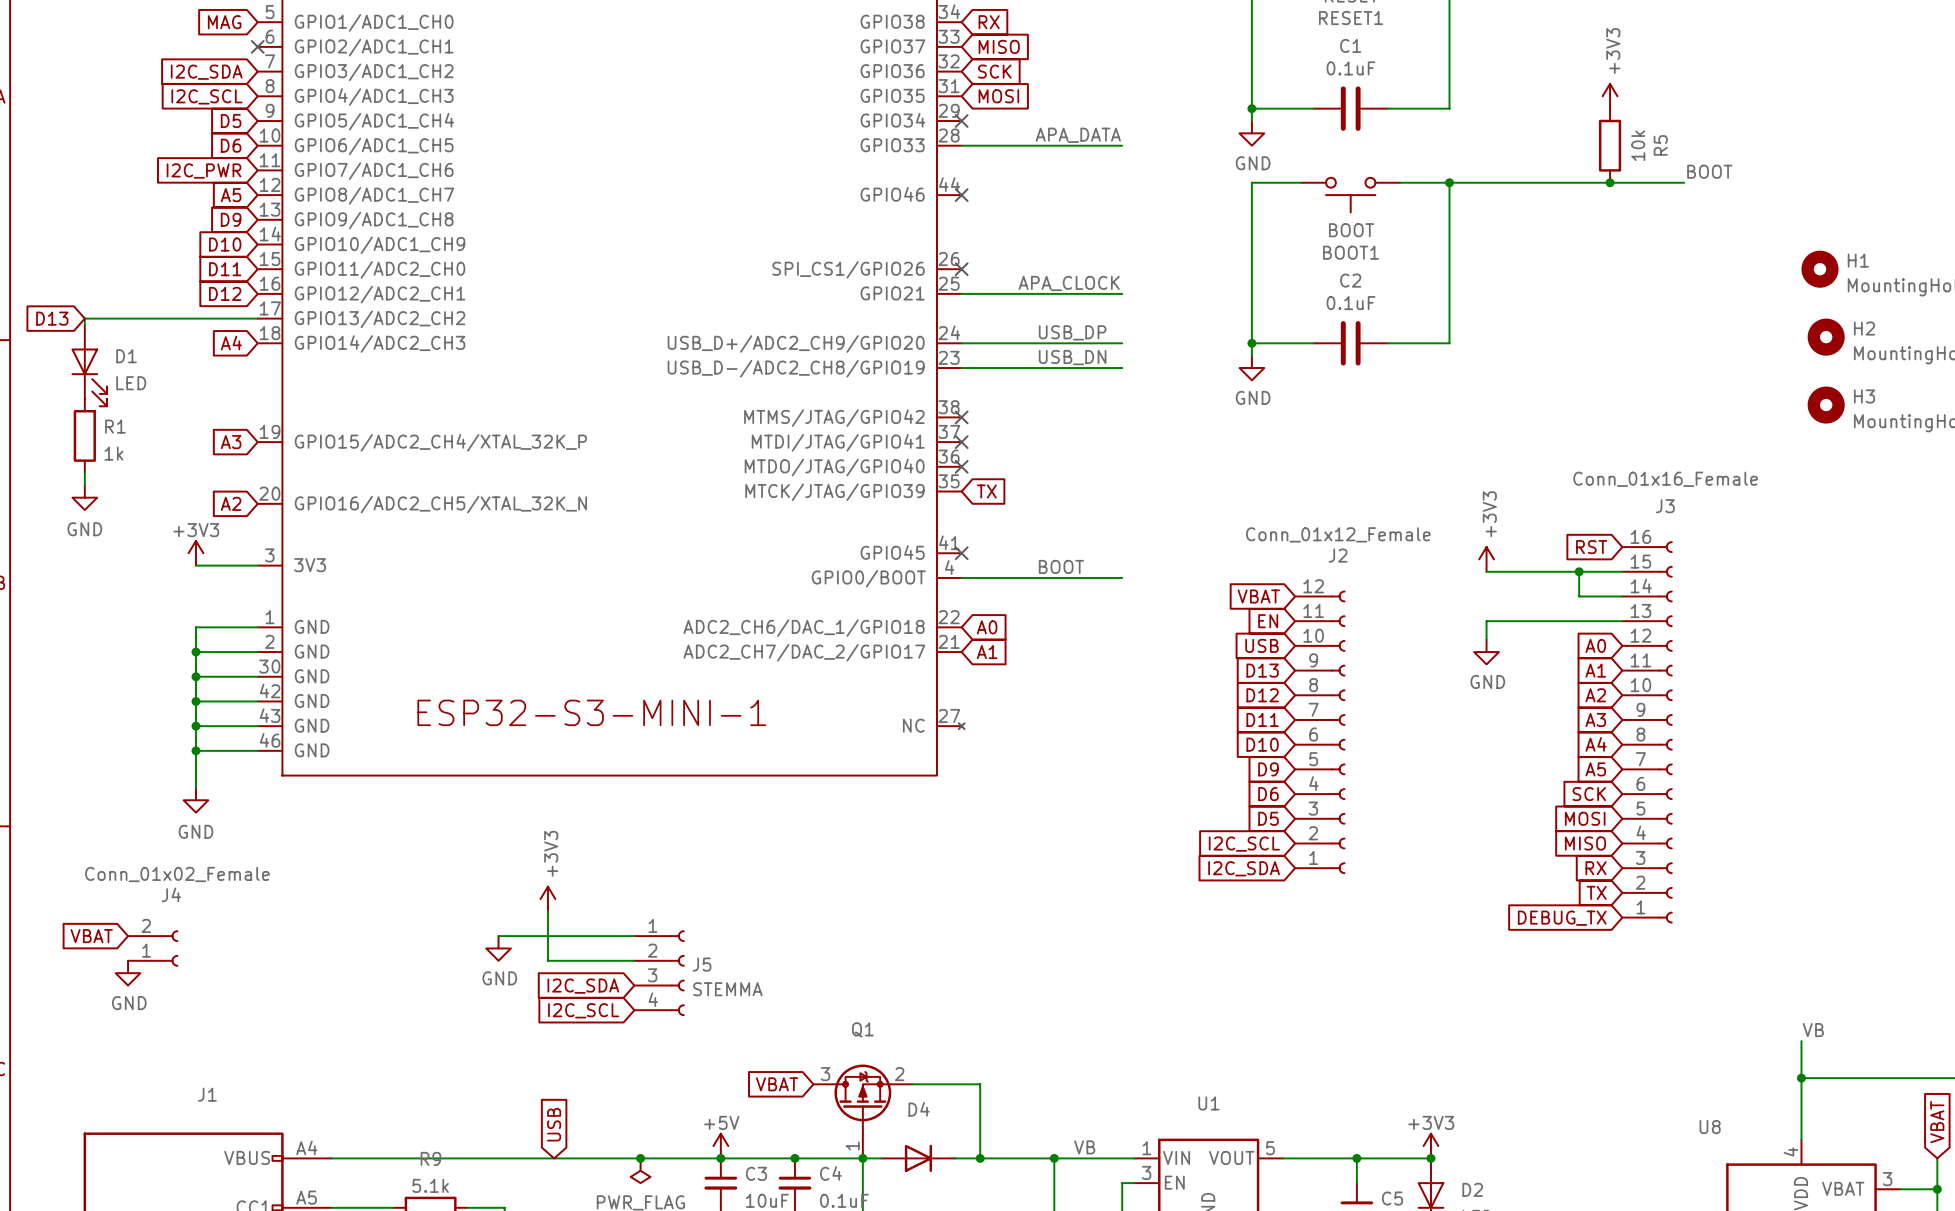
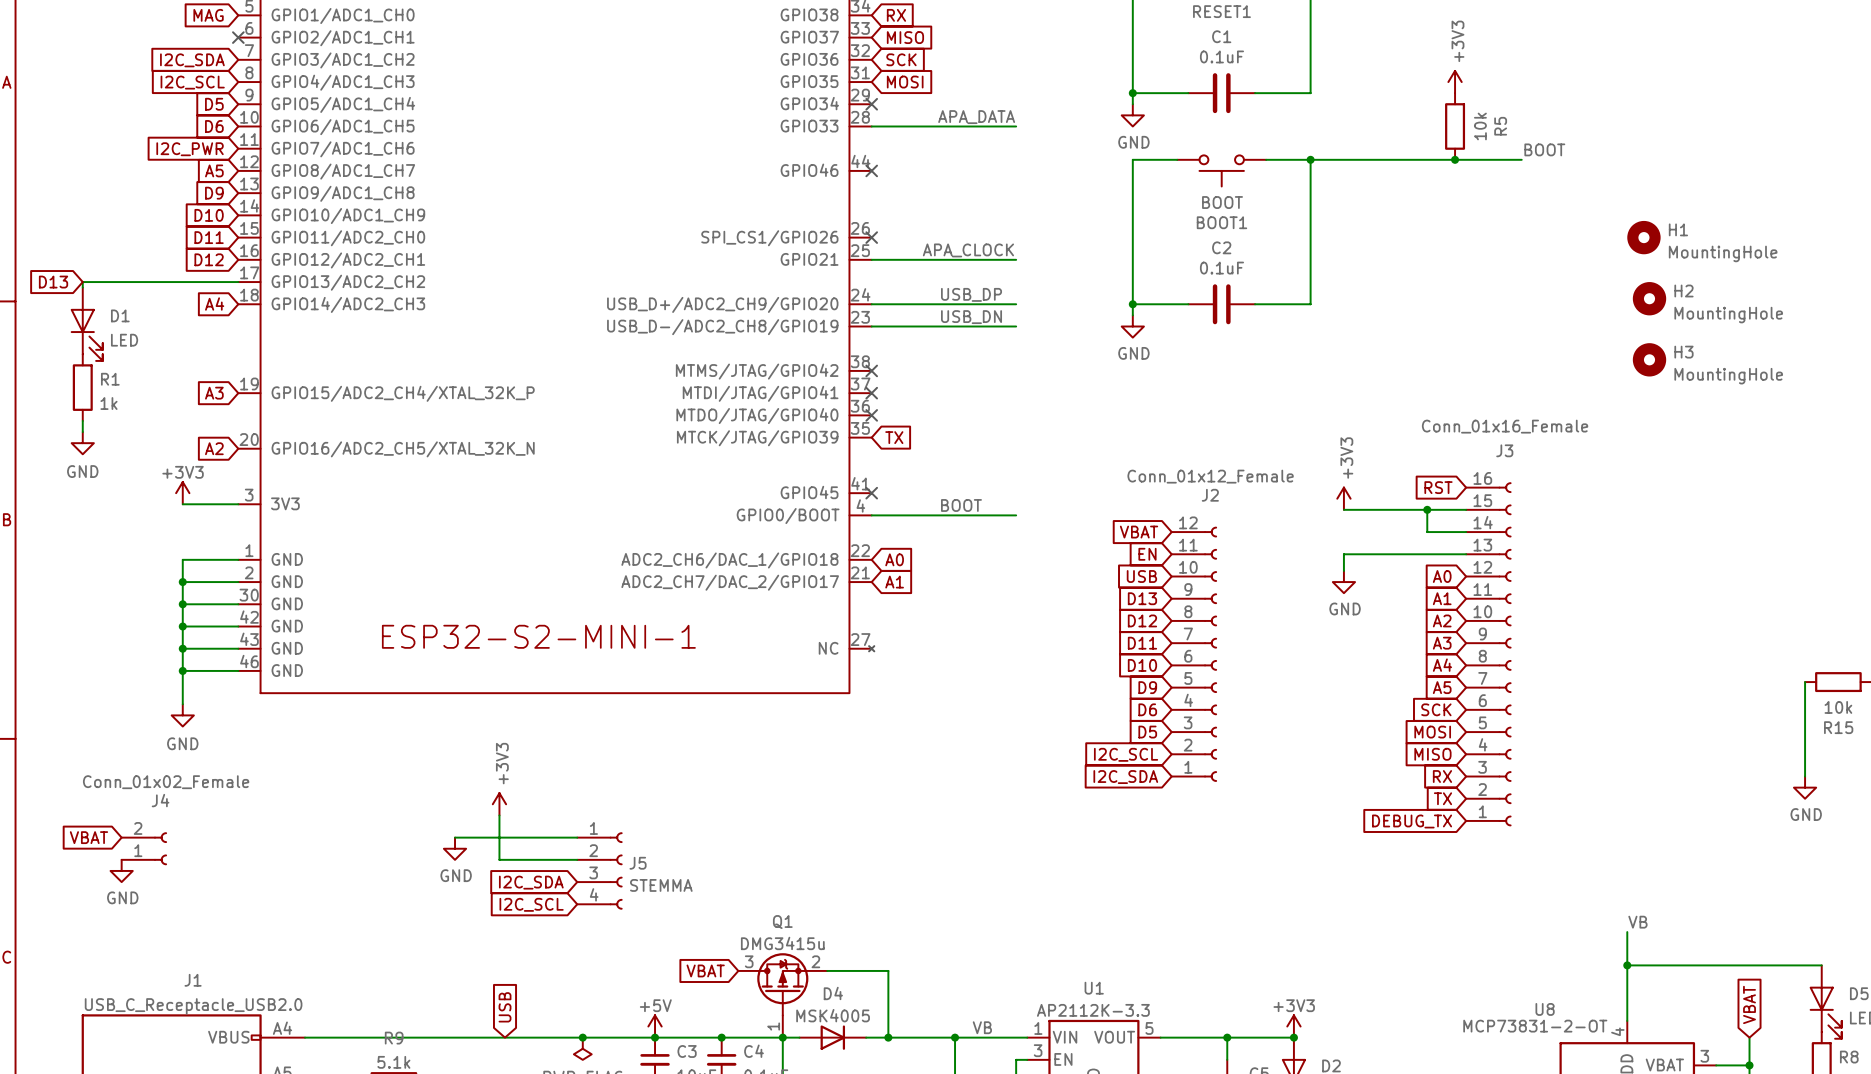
part text: ESP32-S3-MINI-1 (591, 712) -> ESP32-S2-MINI-1 (538, 636)
Q1 value: none -> DMG3415u (782, 943)
J1 value: none -> USB_C_Receptacle_USB2.0 (193, 1006)
U1 value: none -> AP2112K-3.3 (1093, 1010)
D4 value: none -> MSK4005 (833, 1015)
U8 value: none -> MCP73831-2-OT (1535, 1026)

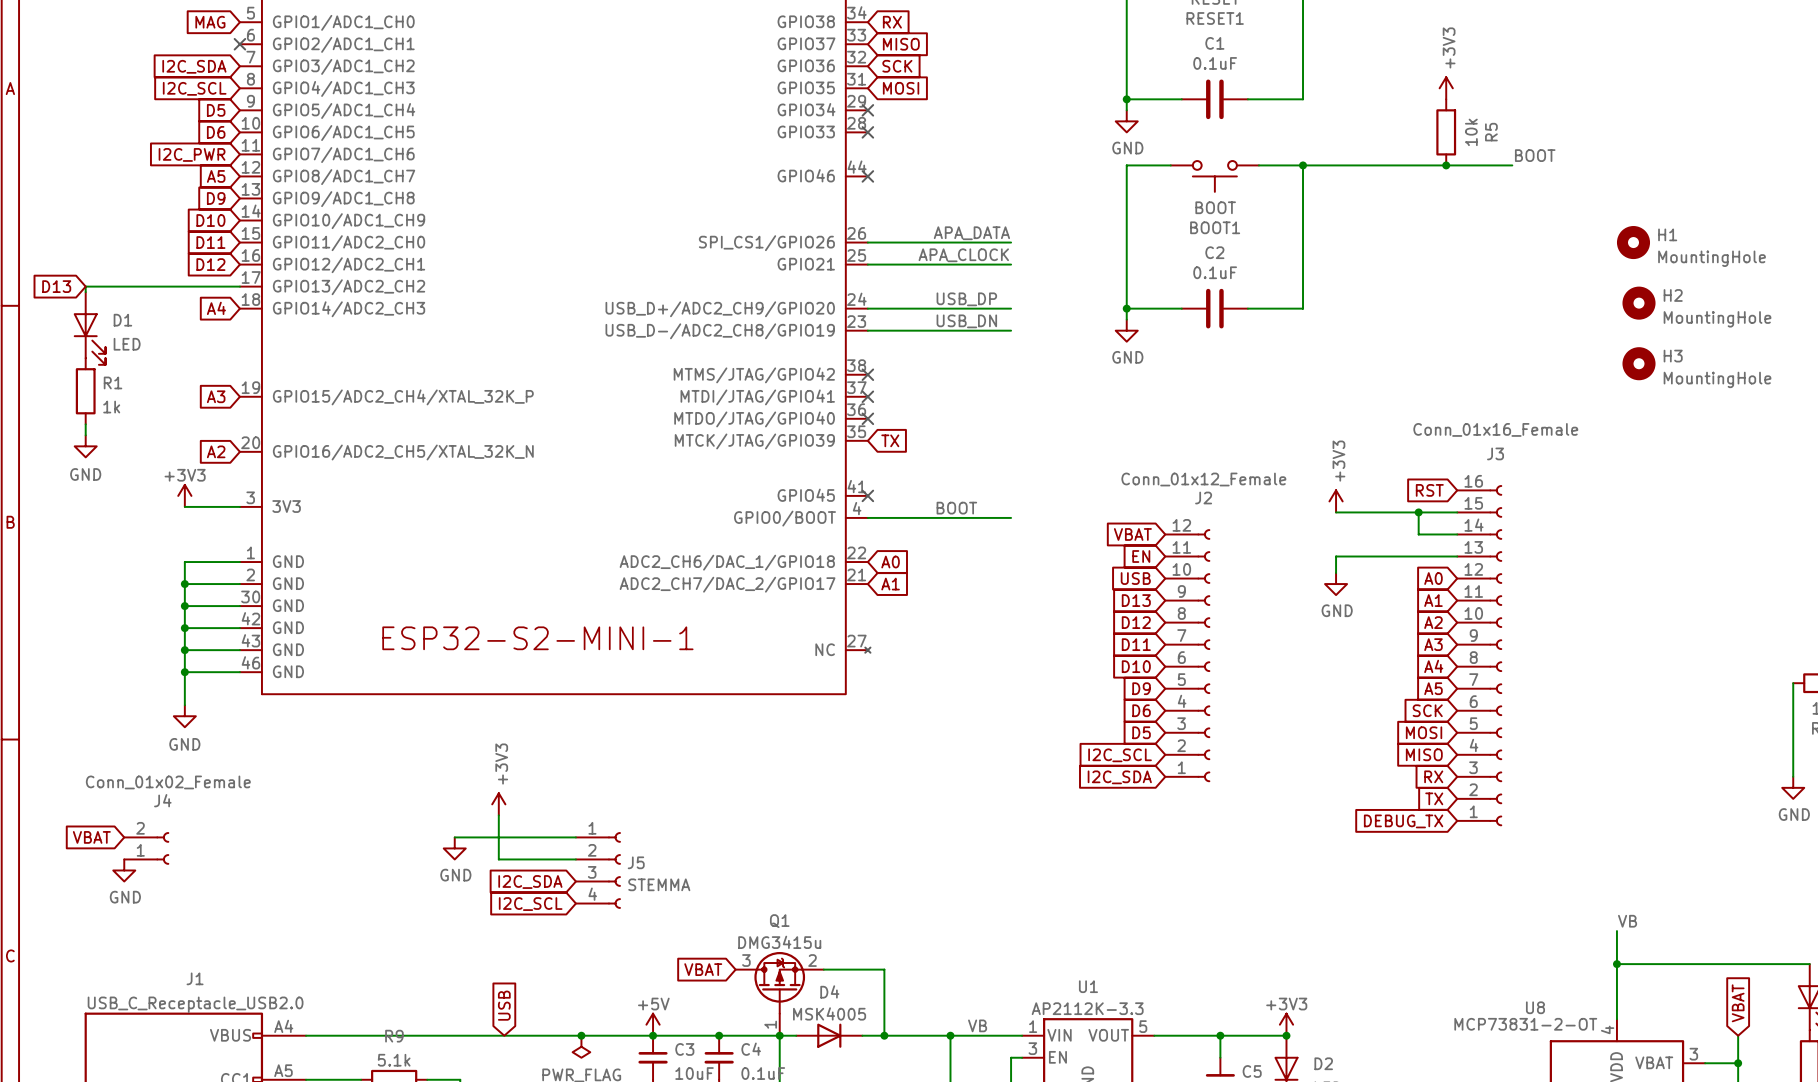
label position: APA_DATA (976, 117) -> APA_DATA (971, 233)
wire: (871, 126) (1016, 126) -> (867, 242) (1011, 242)
no-connect mark: none -> (867, 132)
no-connect mark: (871, 237) -> none

